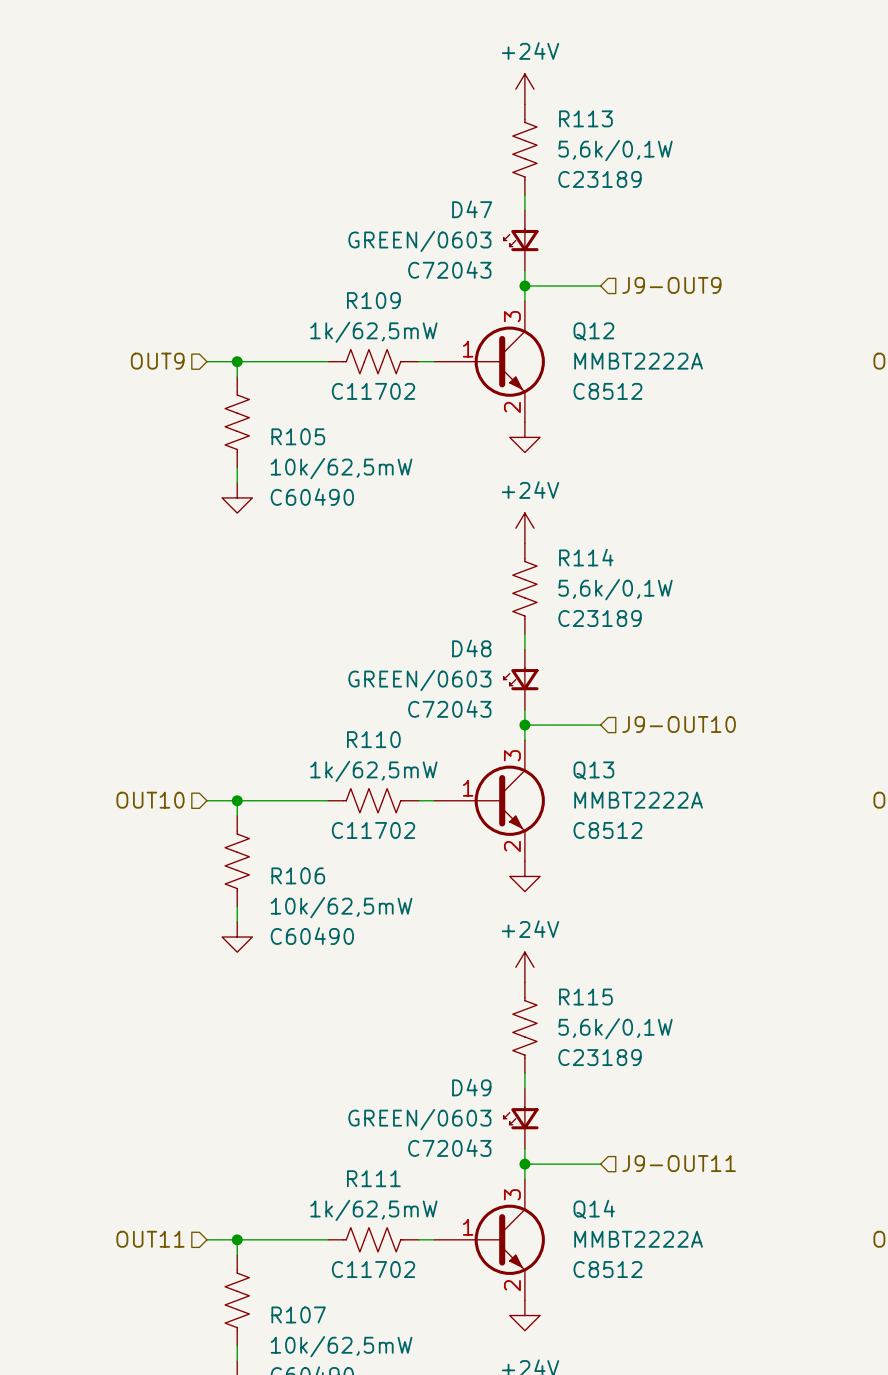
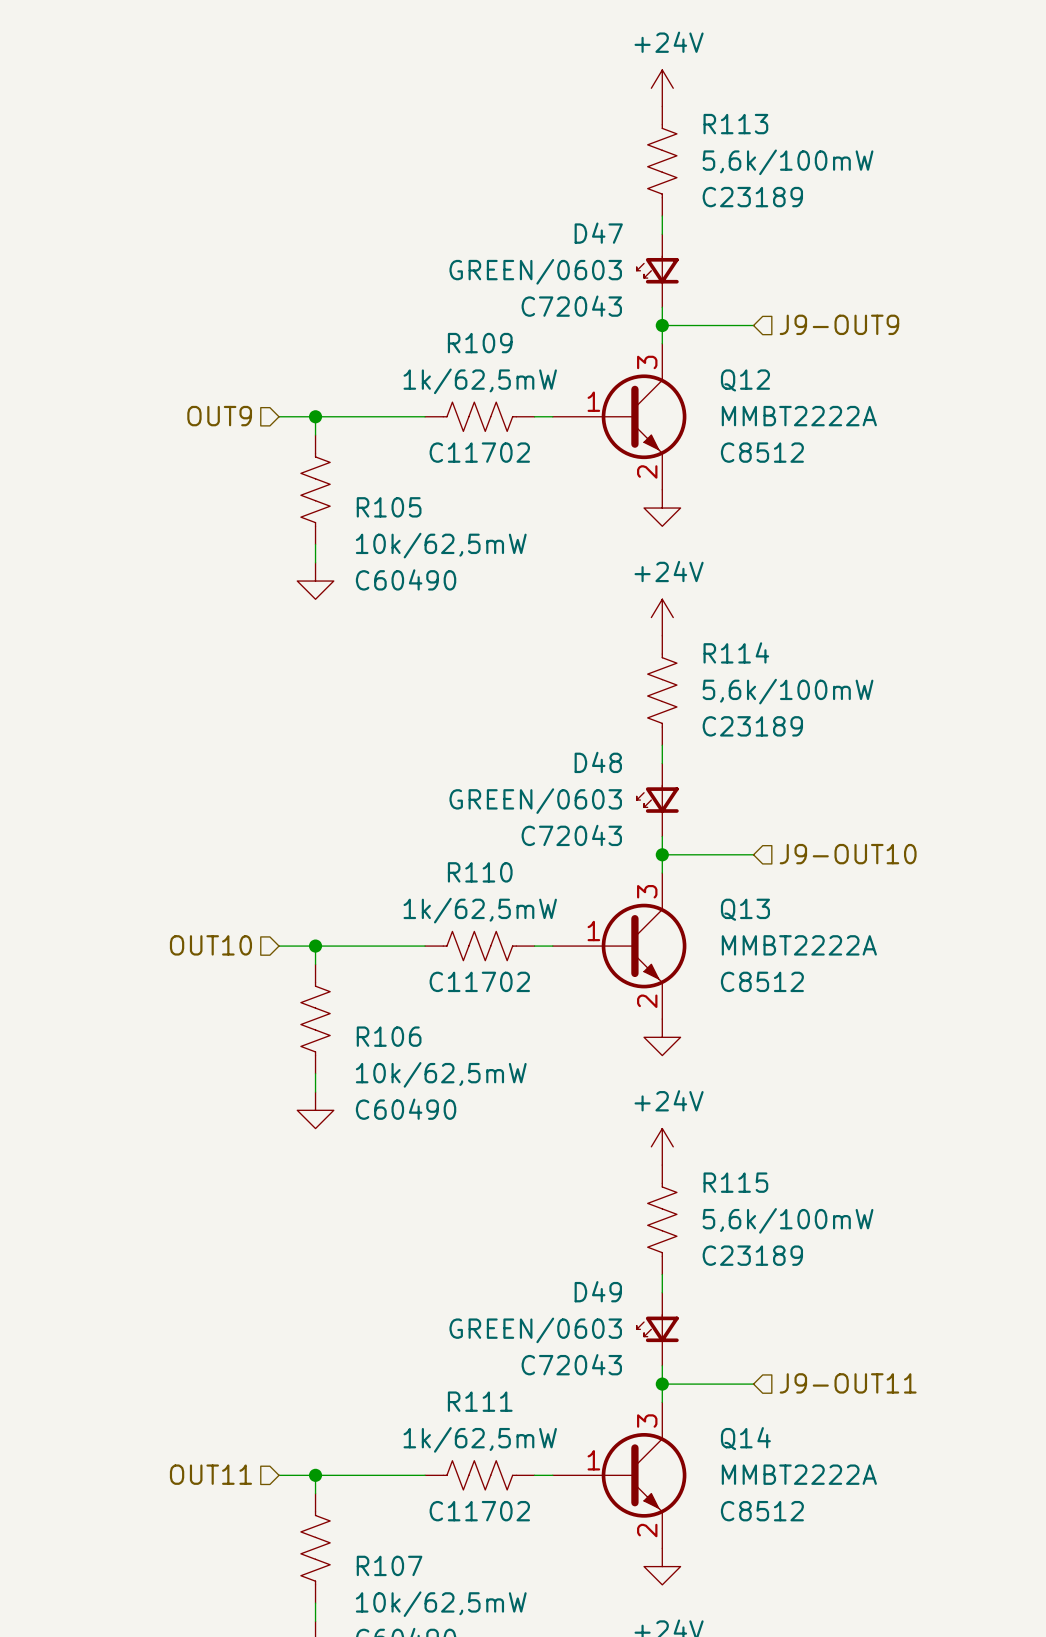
R113 value: 5,6k/0,1W (615, 150) -> 5,6k/100mW (788, 162)
R114 value: 5,6k/0,1W (615, 589) -> 5,6k/100mW (788, 691)
R115 value: 5,6k/0,1W (615, 1028) -> 5,6k/100mW (788, 1220)

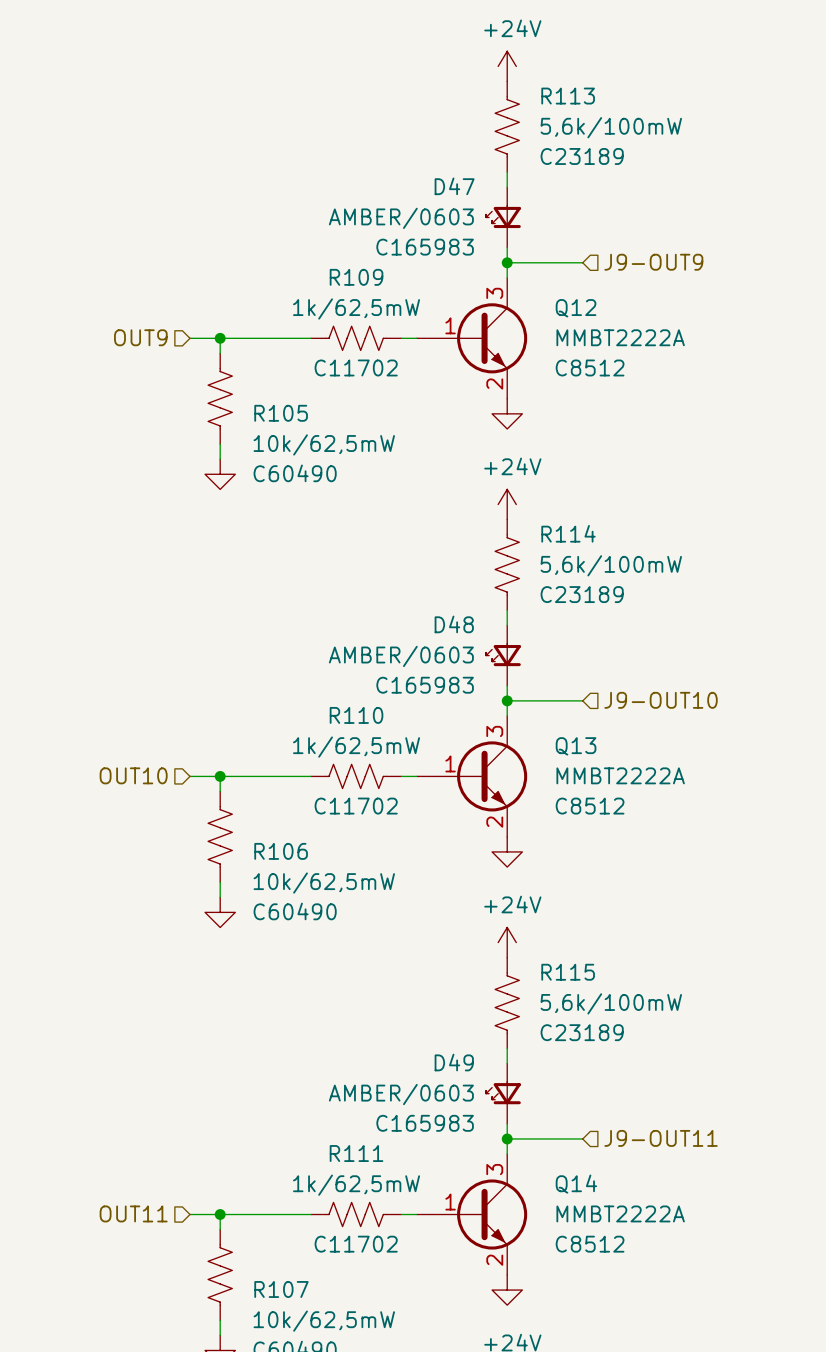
D47 value: GREEN/0603 (535, 271) -> AMBER/0603 (401, 218)
D47 text: C72043 (571, 306) -> C165983 (425, 247)
D48 value: GREEN/0603 (535, 801) -> AMBER/0603 (401, 656)
D48 text: C72043 (571, 835) -> C165983 (425, 685)
D49 value: GREEN/0603 (535, 1330) -> AMBER/0603 (401, 1094)
D49 text: C72043 (571, 1364) -> C165983 (425, 1123)

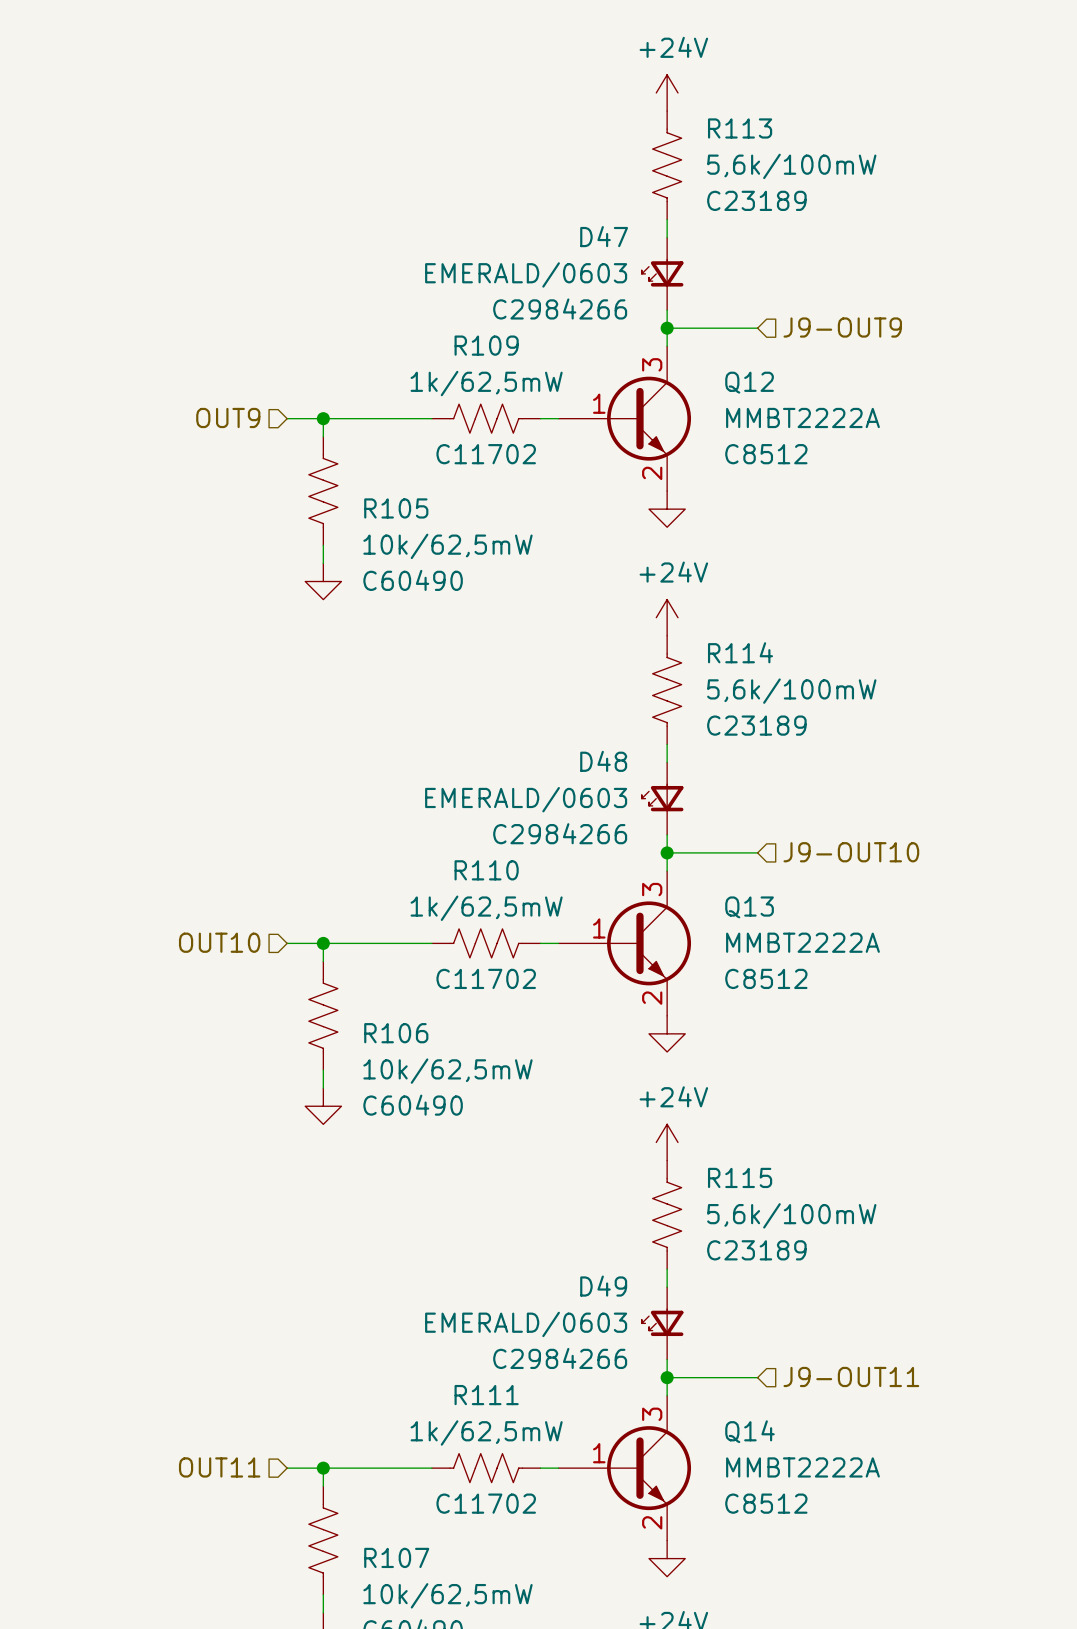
D47 value: AMBER/0603 (401, 218) -> EMERALD/0603 (526, 274)
D47 text: C165983 (425, 247) -> C2984266 (560, 308)
D48 value: AMBER/0603 (401, 656) -> EMERALD/0603 (526, 799)
D48 text: C165983 (425, 685) -> C2984266 (560, 833)
D49 value: AMBER/0603 (401, 1094) -> EMERALD/0603 (526, 1324)
D49 text: C165983 (425, 1123) -> C2984266 (560, 1358)

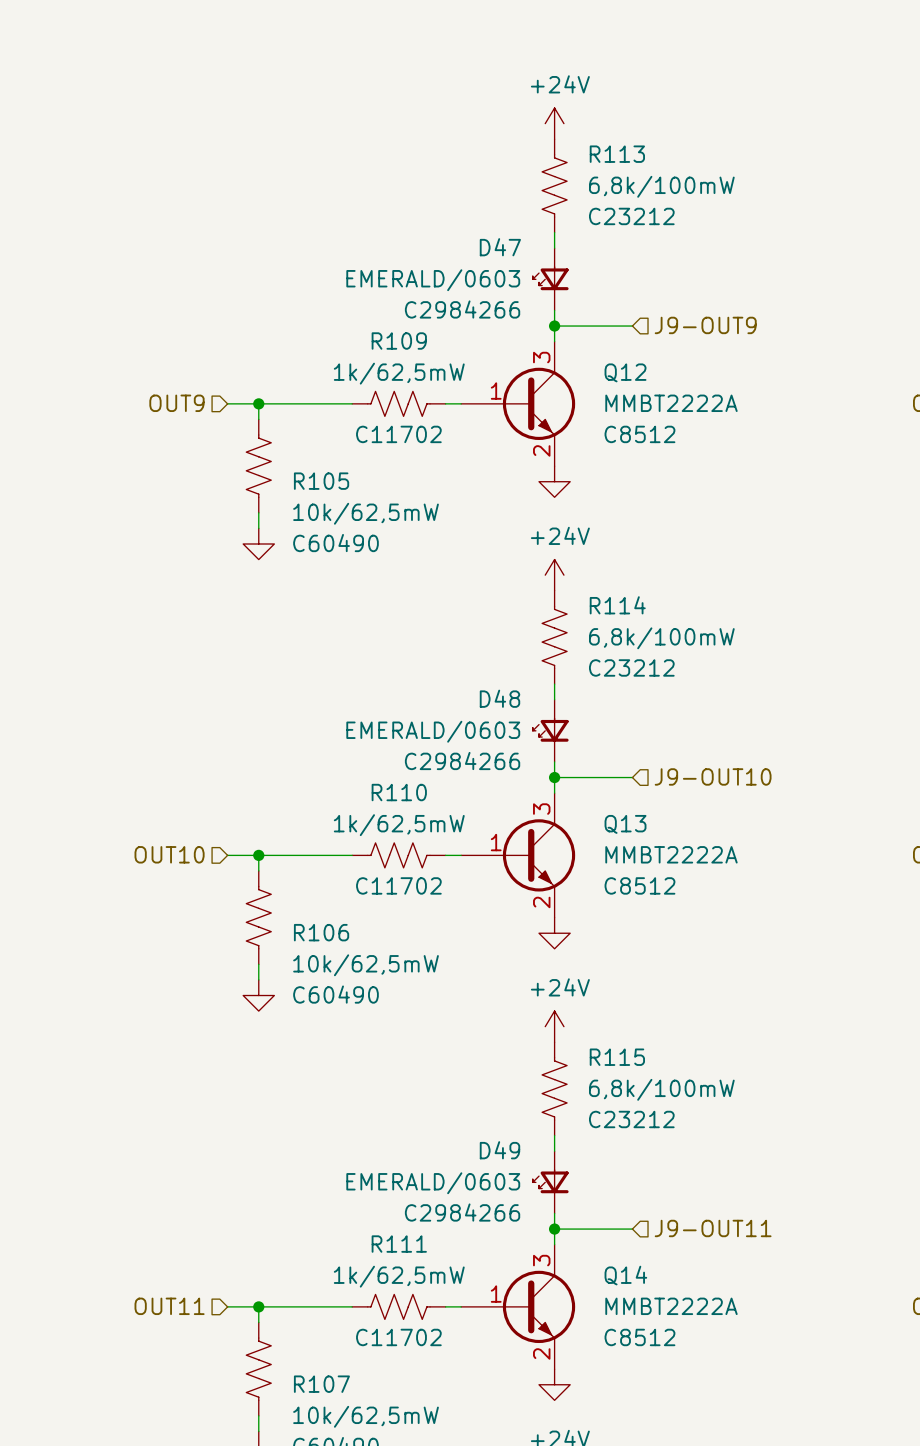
R113 value: 5,6k/100mW (791, 166) -> 6,8k/100mW (661, 186)
R113 text: C23189 (756, 200) -> C23212 (631, 216)
R114 value: 5,6k/100mW (791, 691) -> 6,8k/100mW (661, 638)
R114 text: C23189 (756, 725) -> C23212 (631, 667)
R115 value: 5,6k/100mW (791, 1215) -> 6,8k/100mW (661, 1089)
R115 text: C23189 (756, 1250) -> C23212 (631, 1119)

